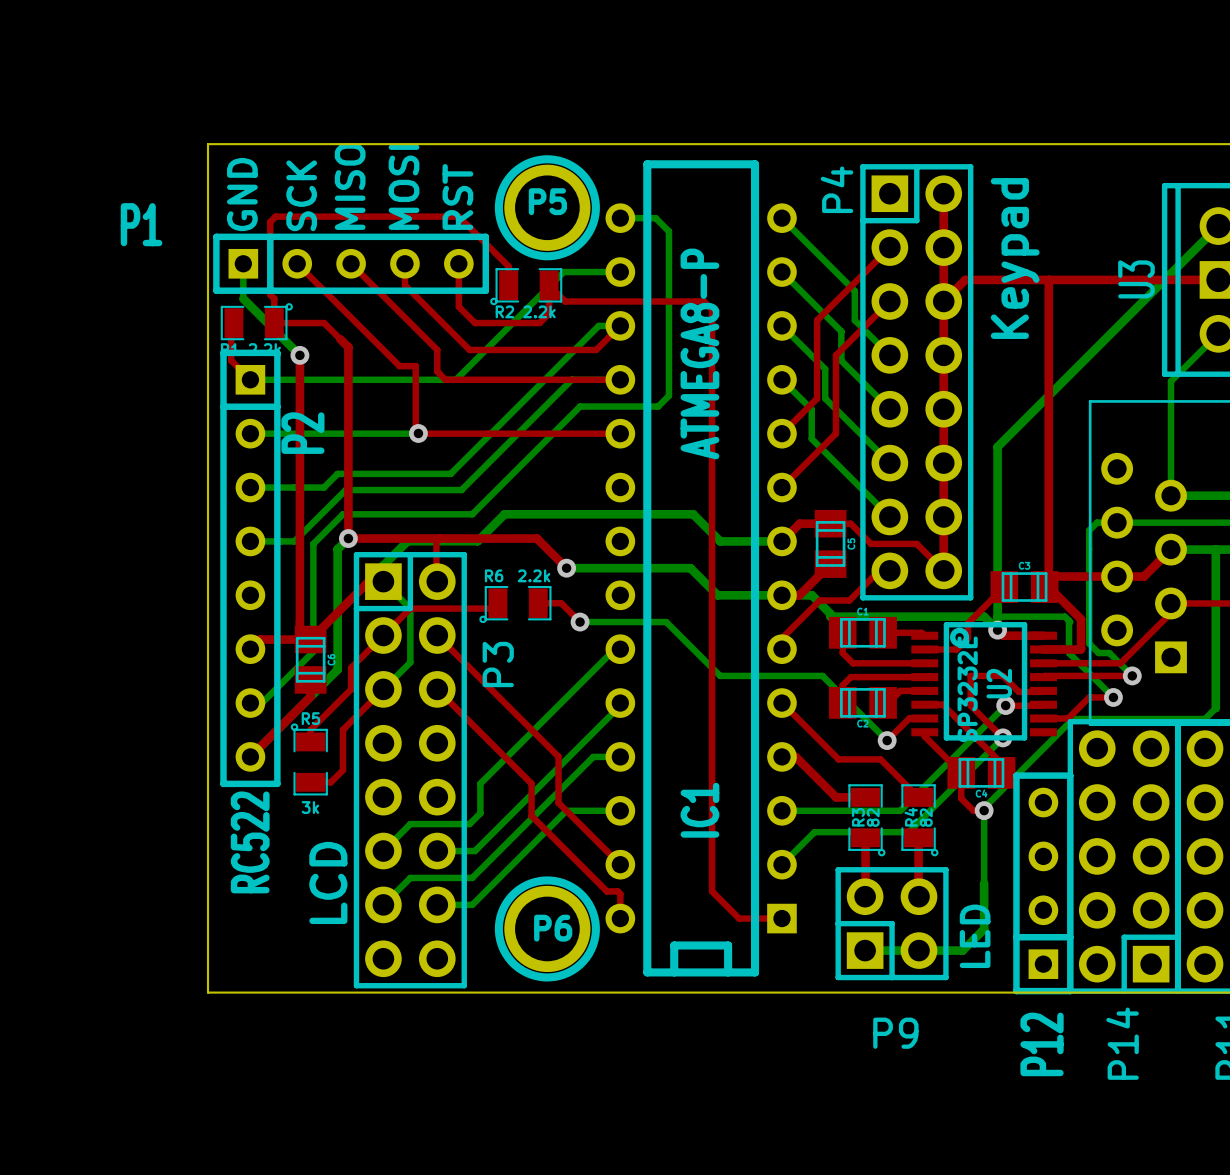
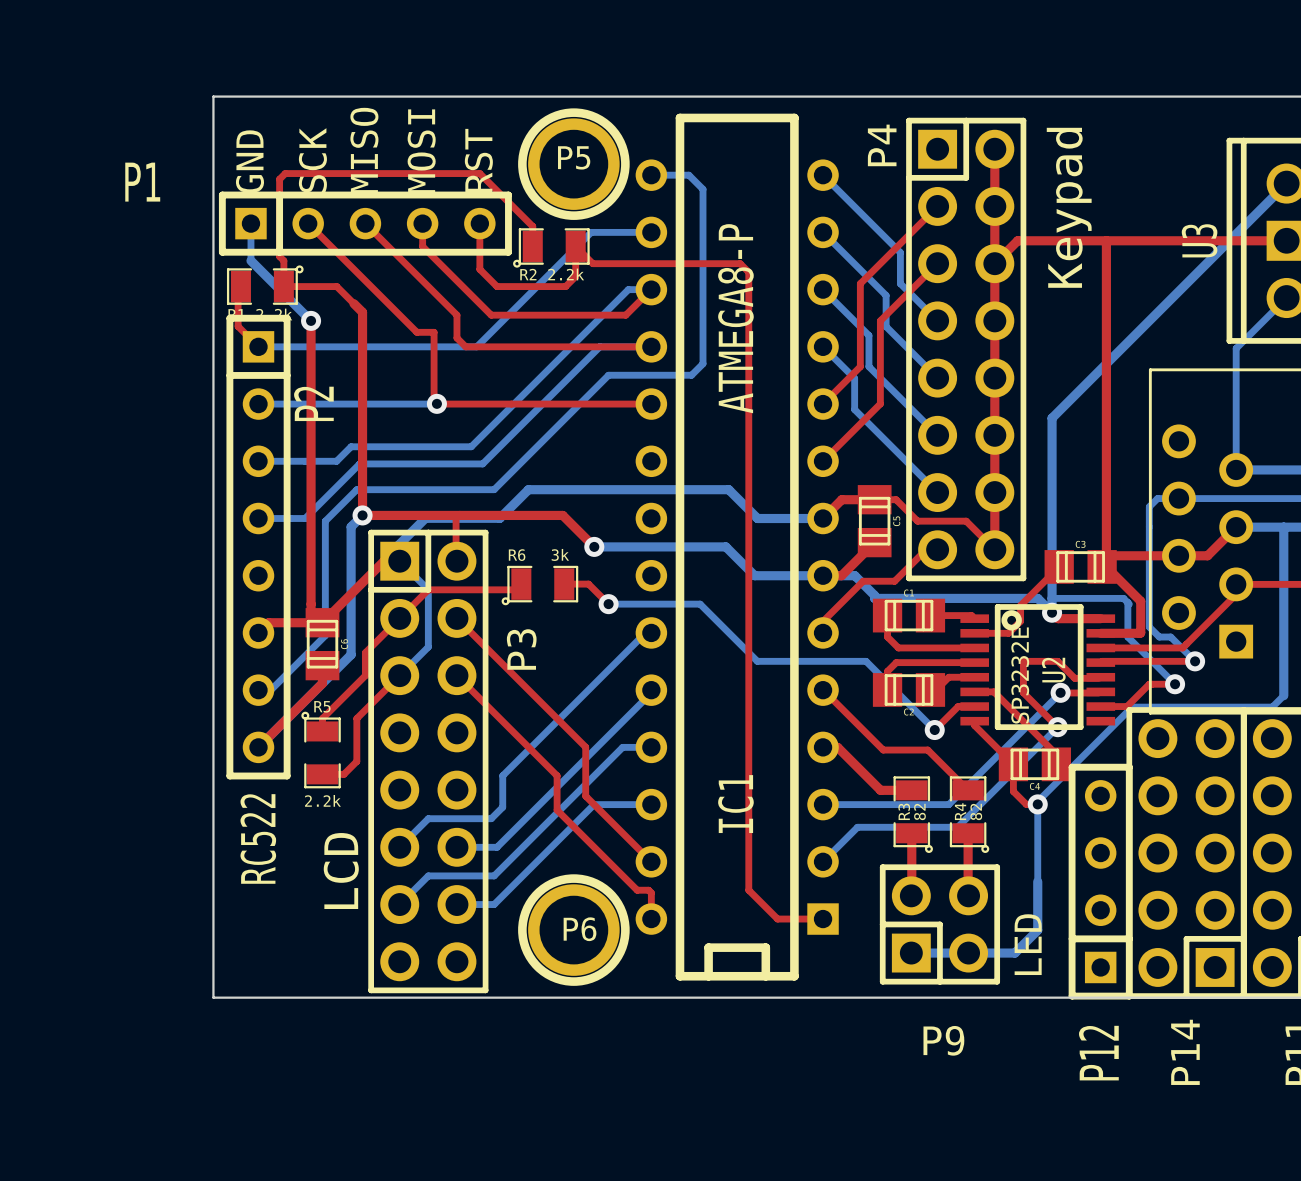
R6 value: 2.2k (534, 575) -> 3k (560, 554)
R5 value: 3k (310, 807) -> 2.2k (322, 800)

